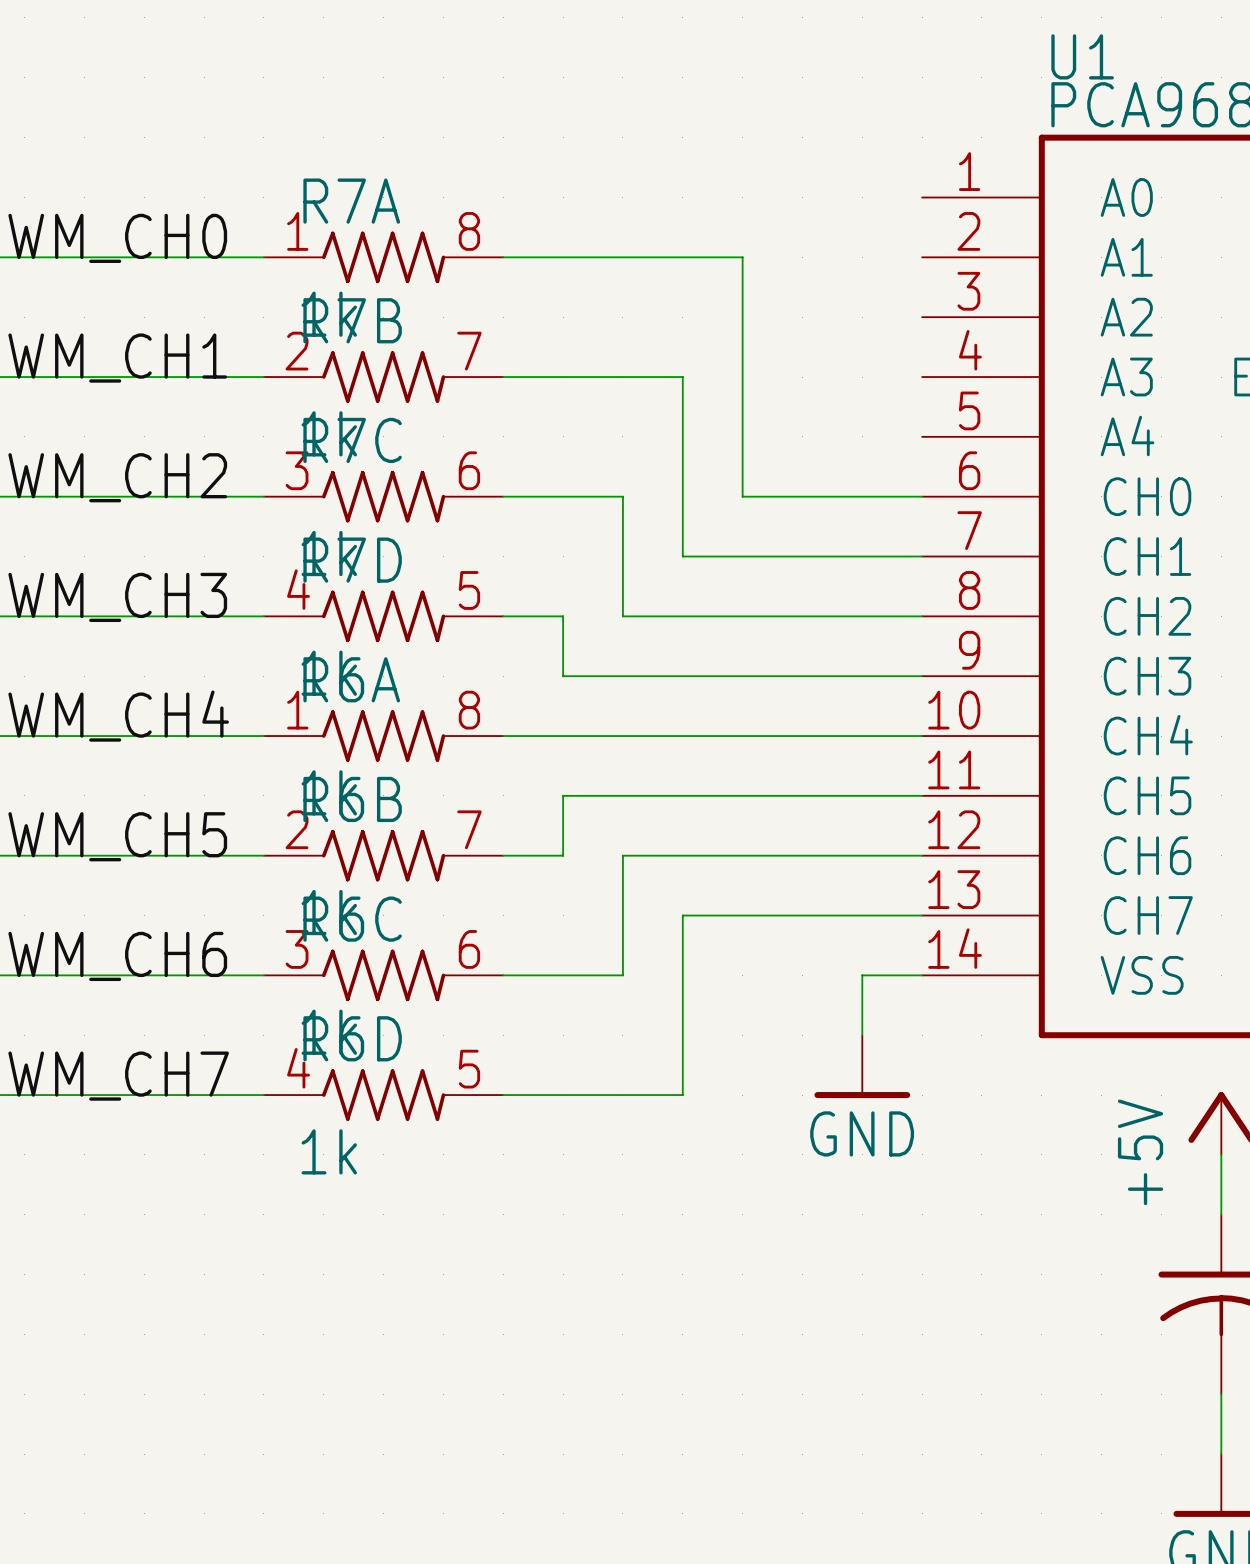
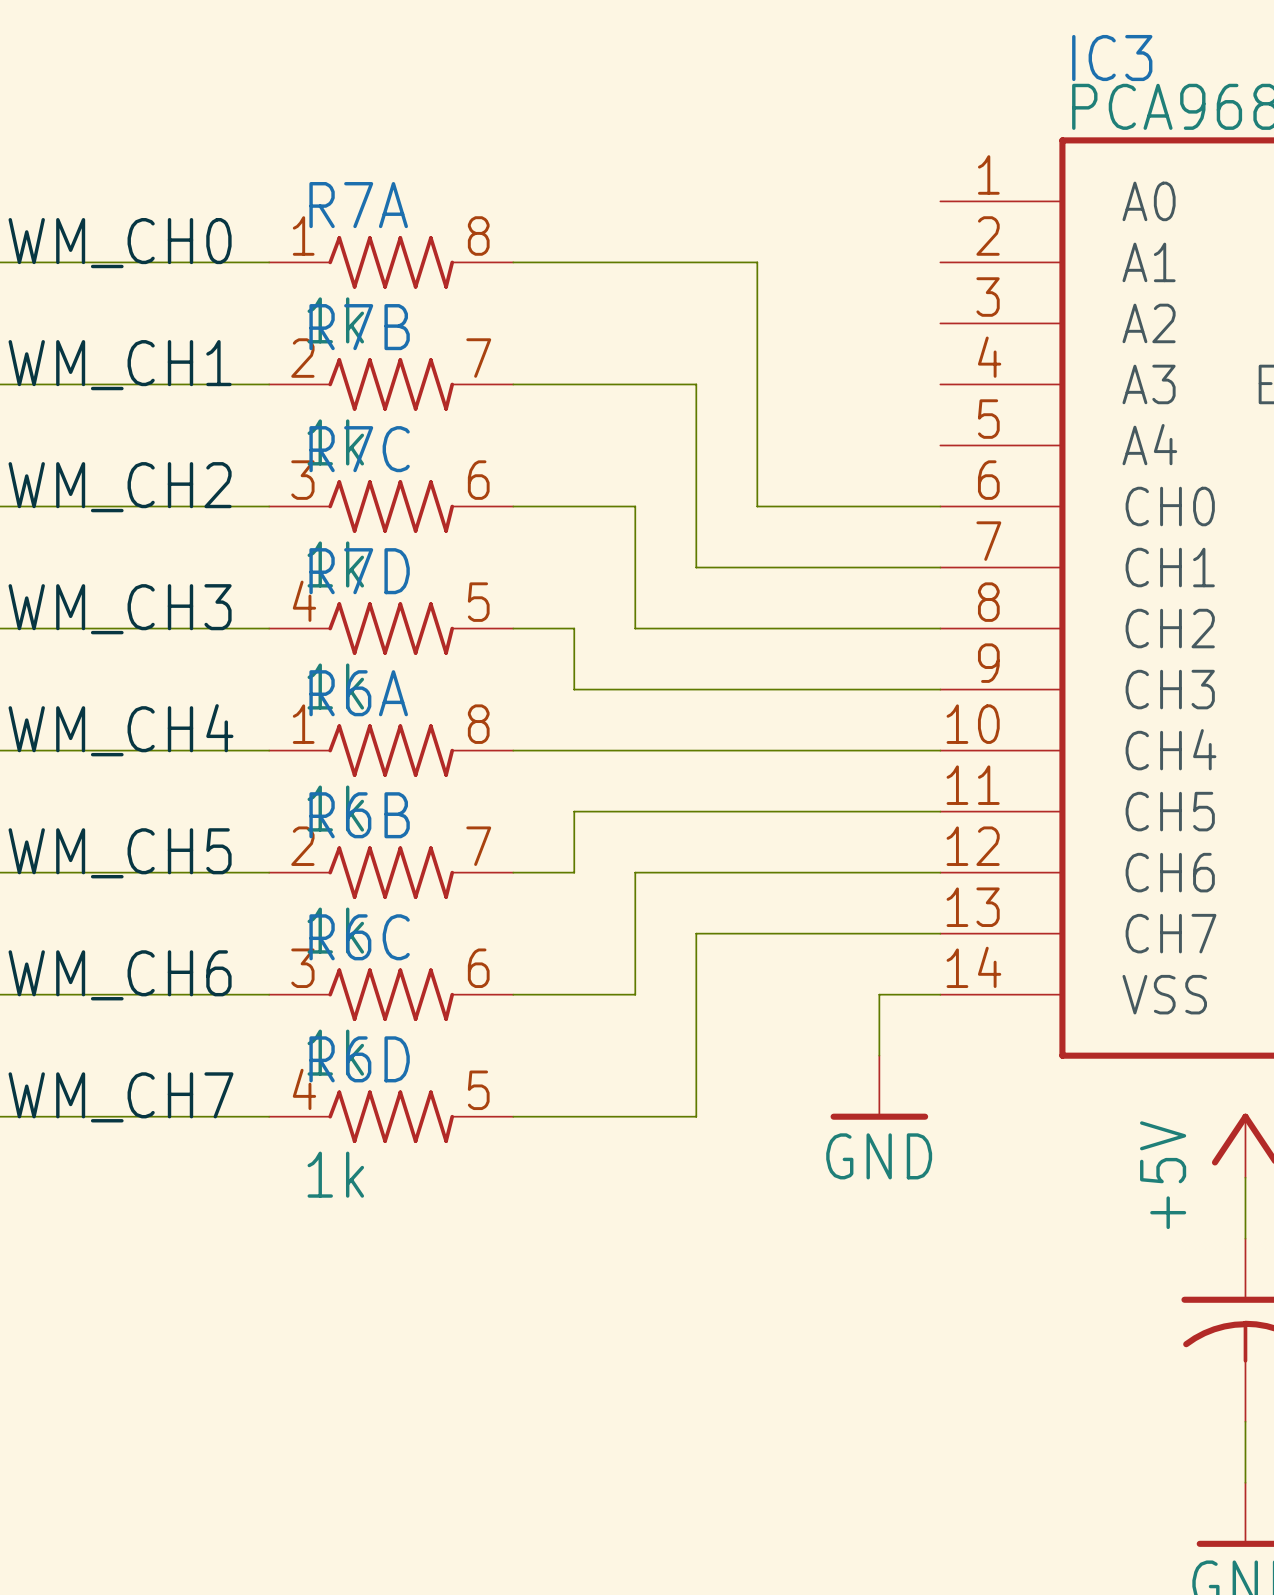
U1 name: U1 (1082, 56) -> IC3 (1112, 58)

